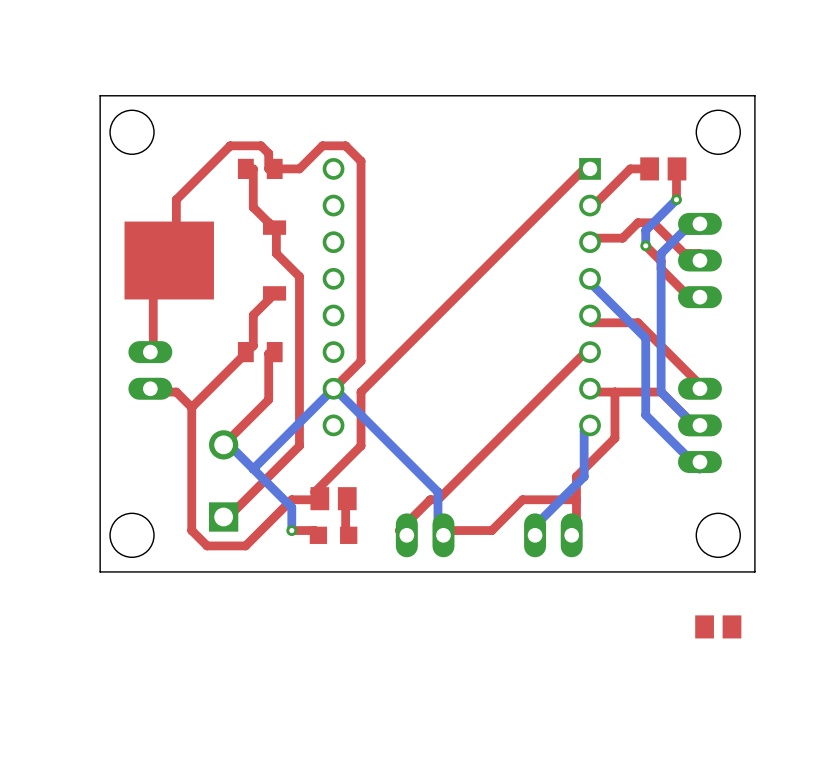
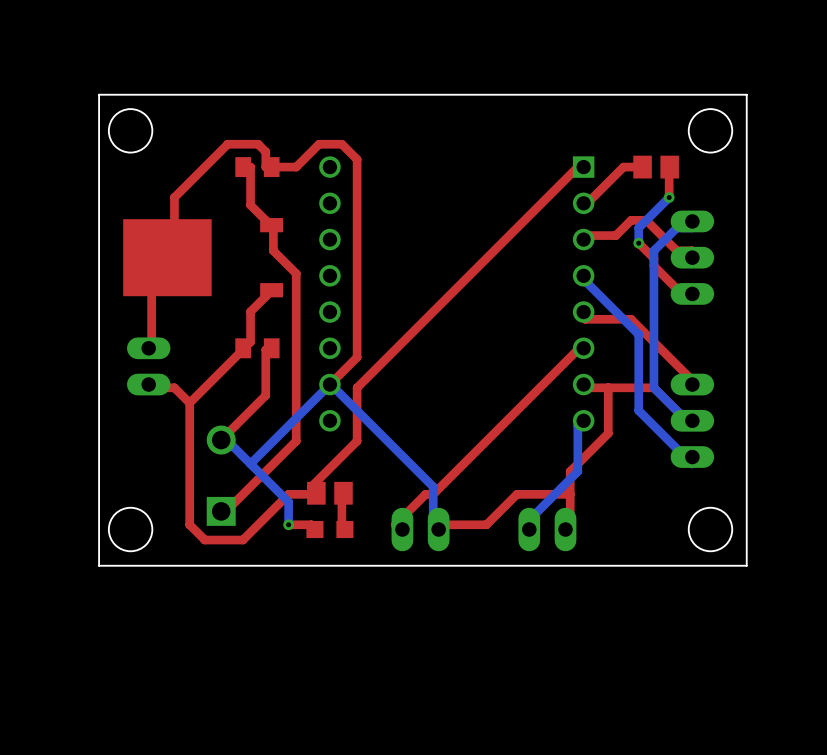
part: (718, 626) -> none

